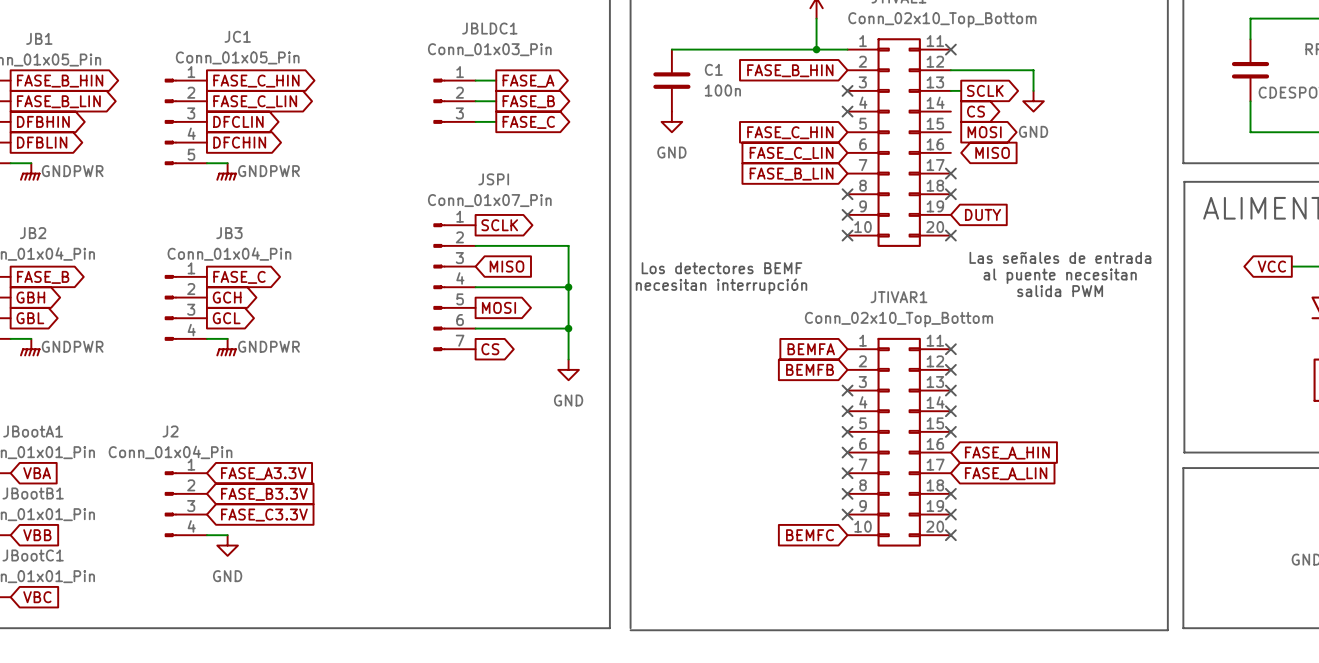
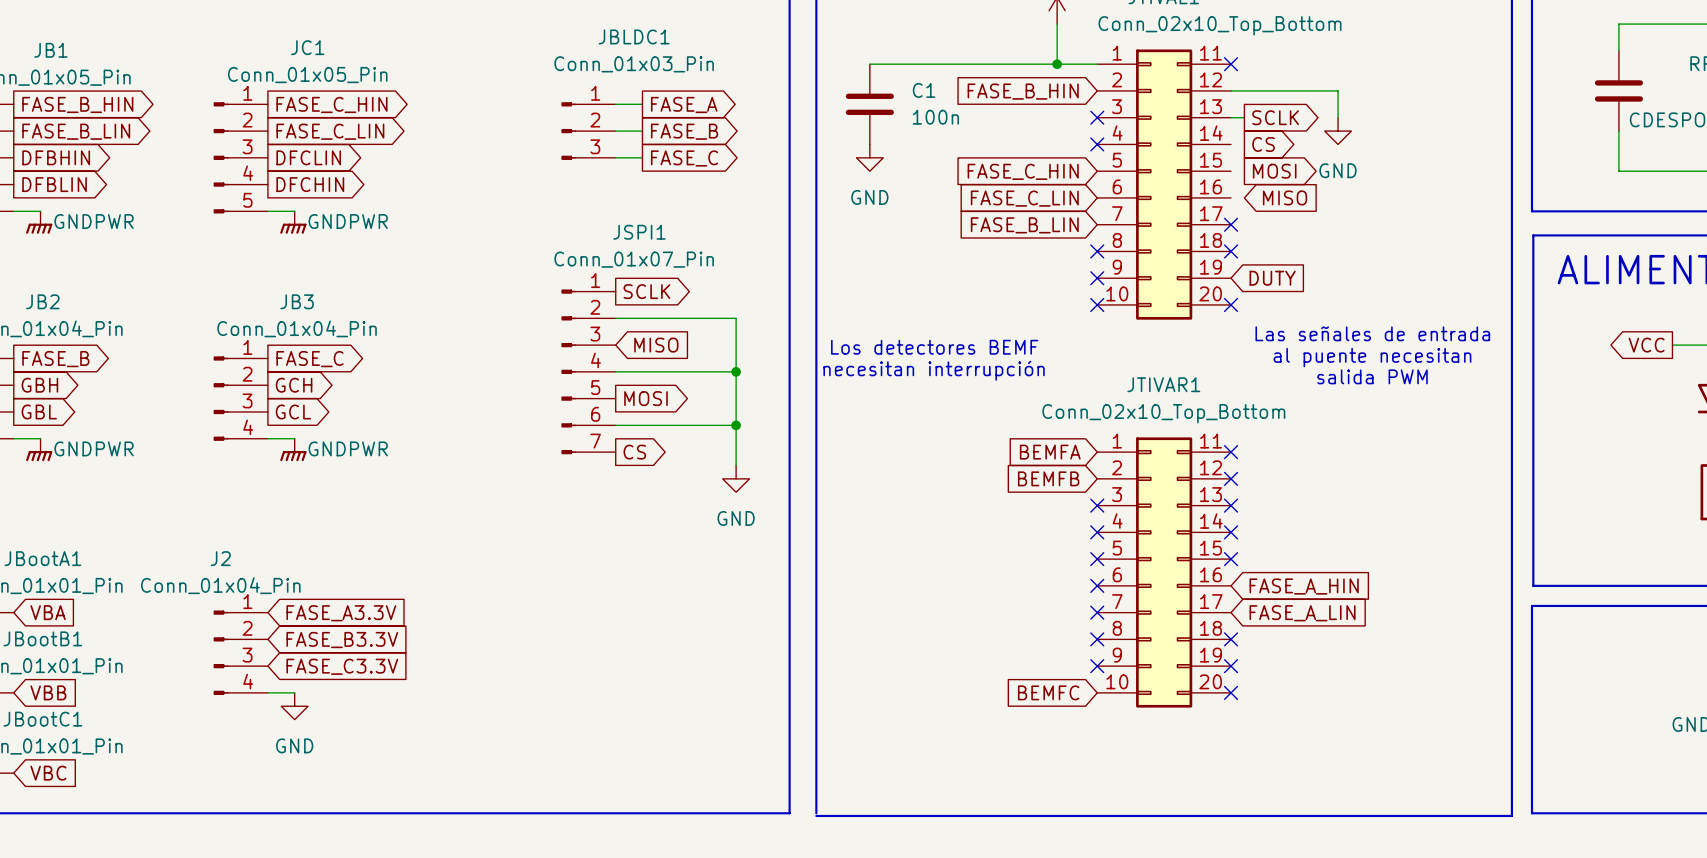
JSPI name: JSPI (493, 179) -> JSPI1 (639, 232)

